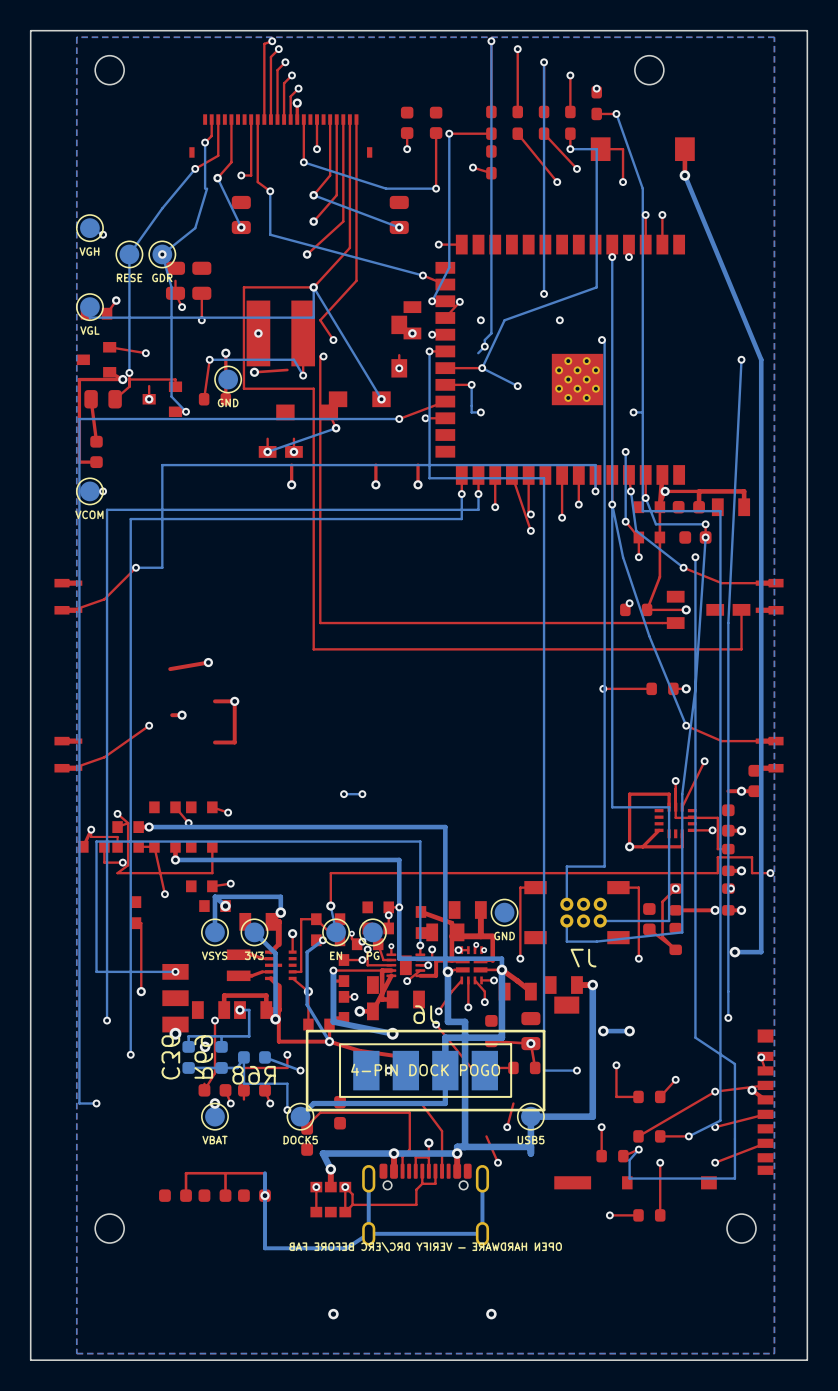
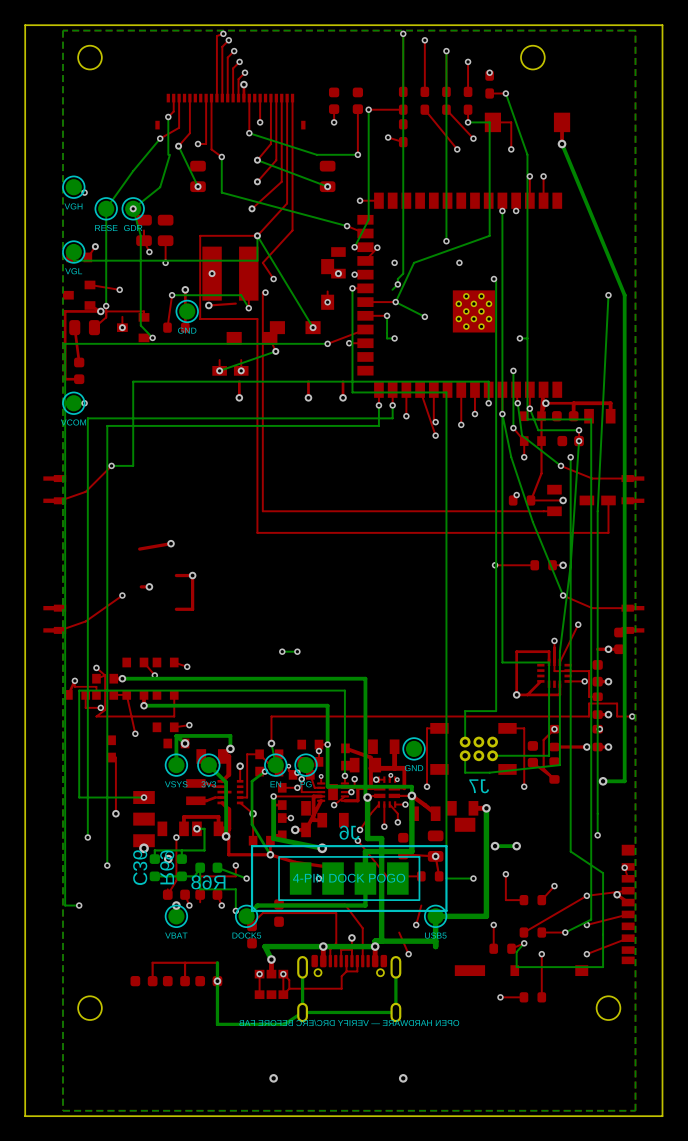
part rotation: 0° (68, 596) -> 180° (54, 489)
part rotation: 0° (769, 596) -> 180° (632, 489)
part rotation: 0° (68, 754) -> 180° (54, 619)
part rotation: 0° (769, 754) -> 180° (632, 619)

